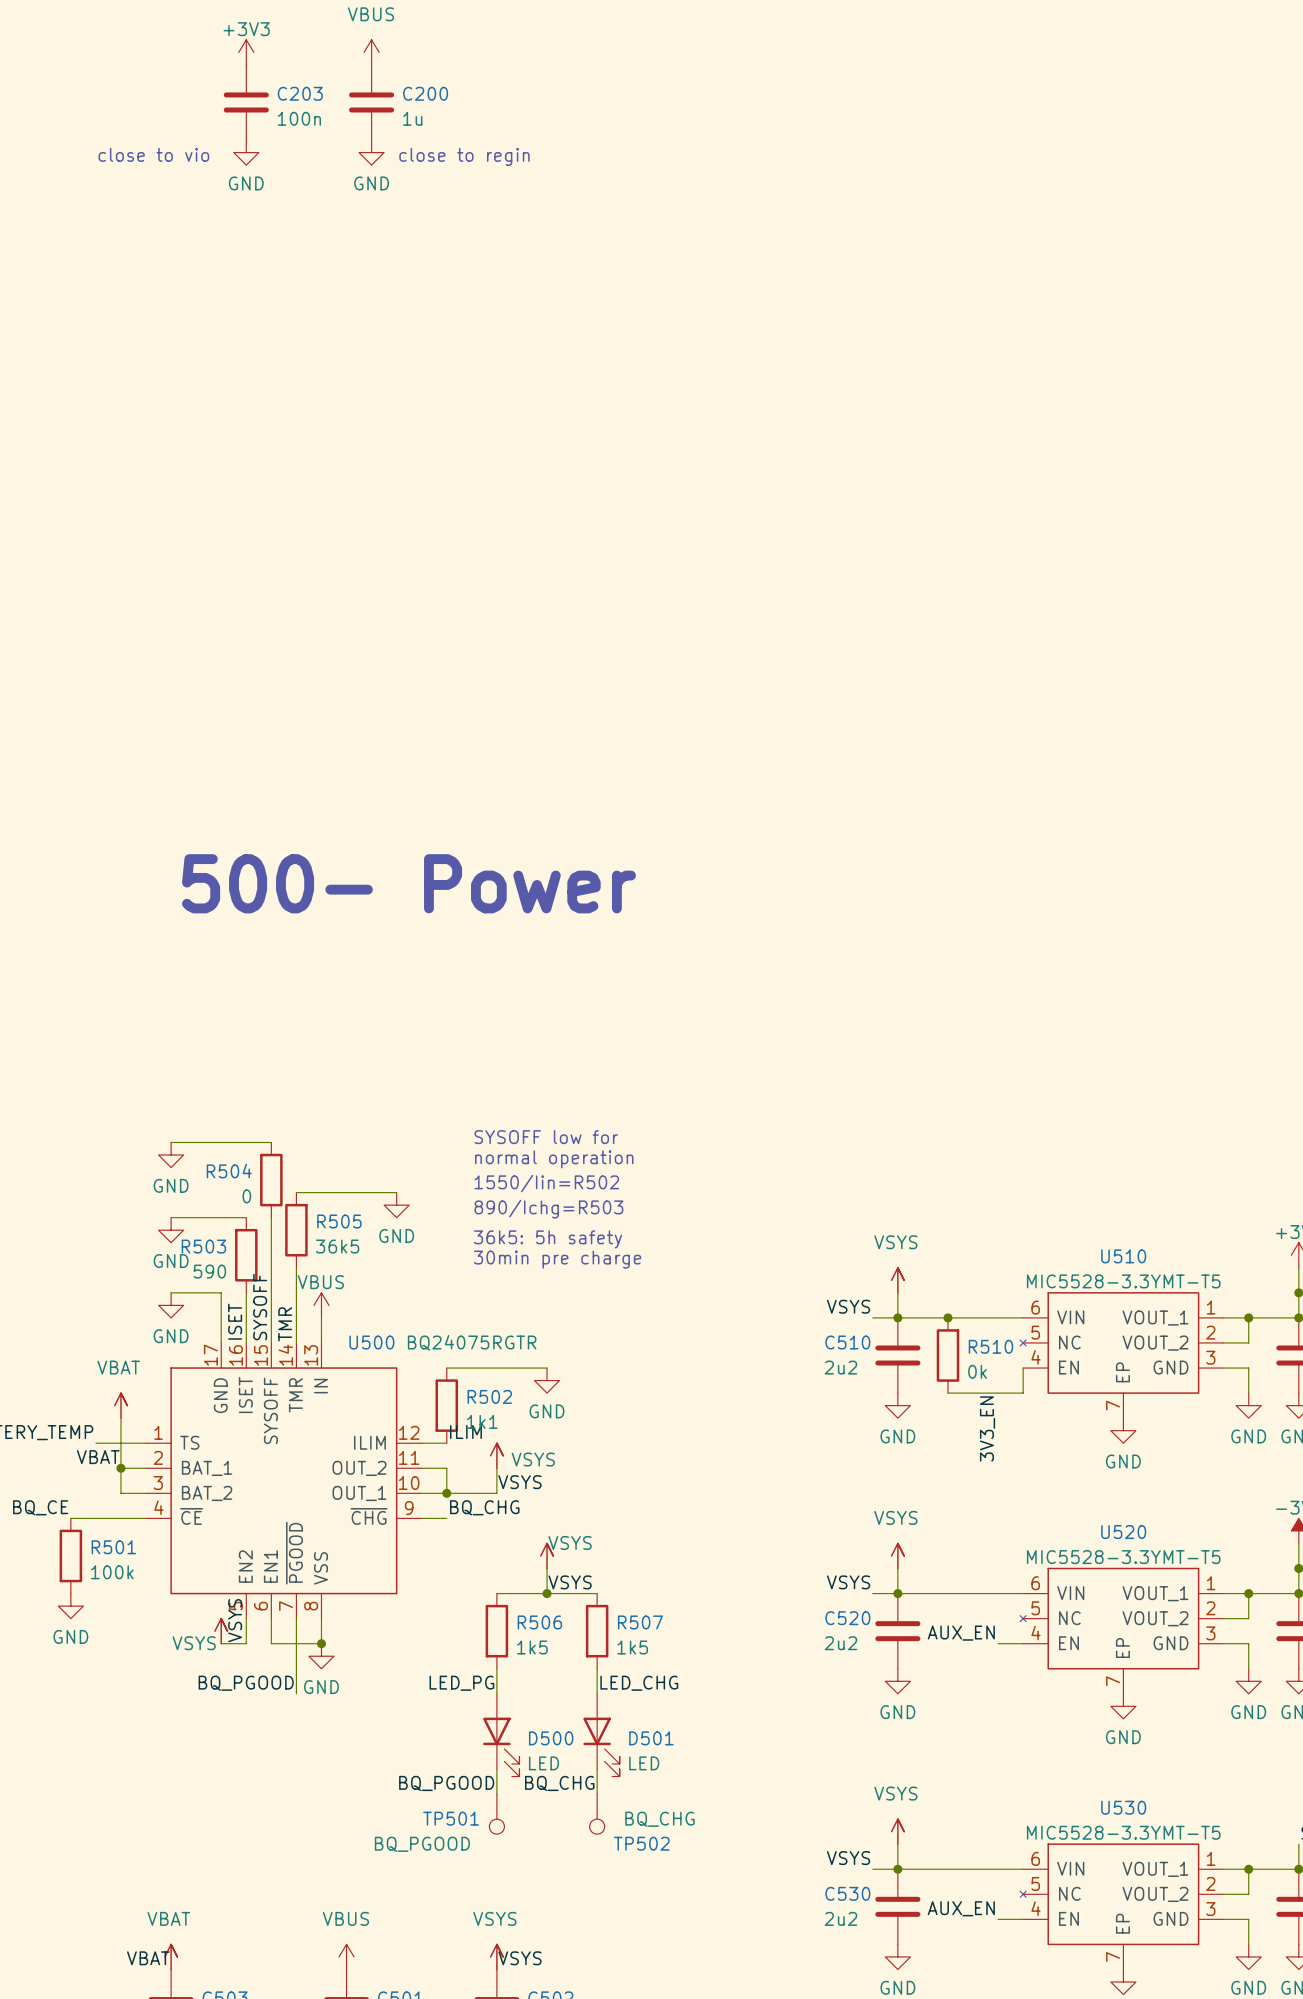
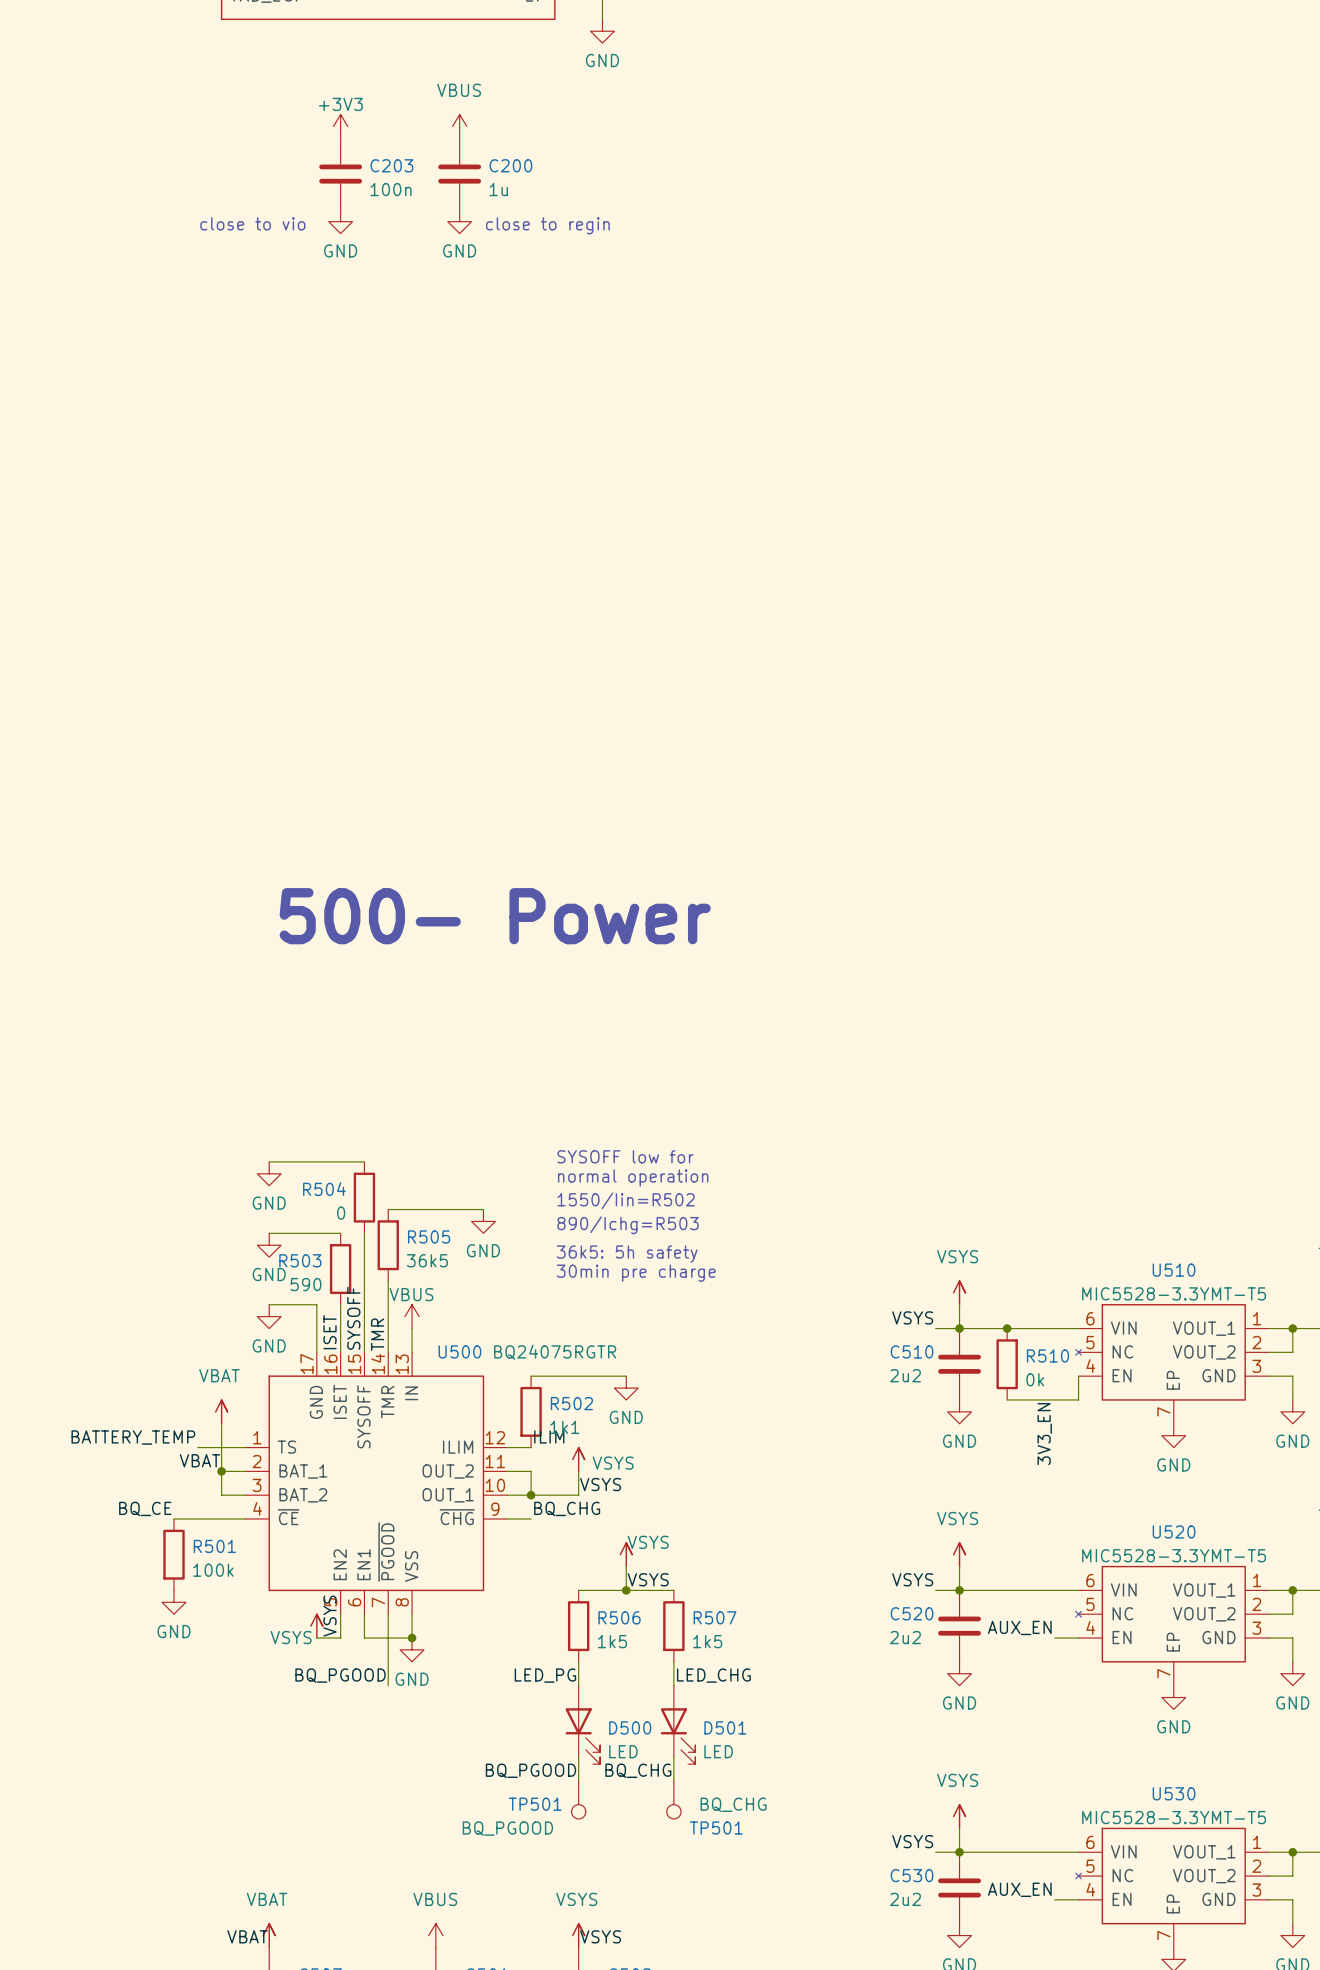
TP502 name: TP502 (641, 1843) -> TP501 (716, 1828)

